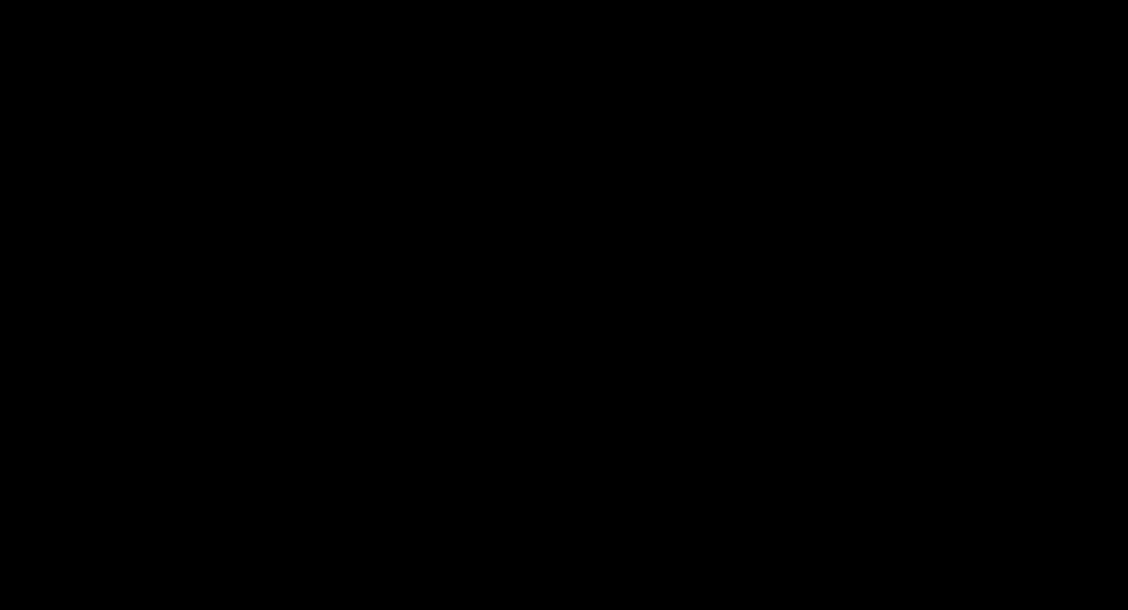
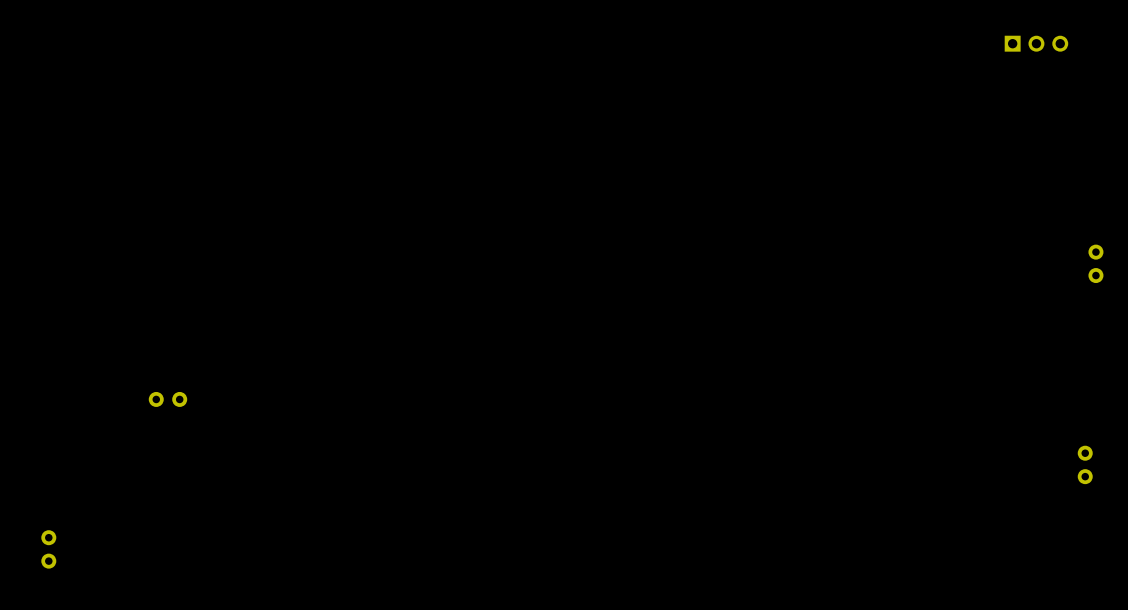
part: none -> (1036, 43)
part: none -> (1095, 263)
part: none -> (167, 399)
part: none -> (1085, 464)
part: none -> (48, 549)

